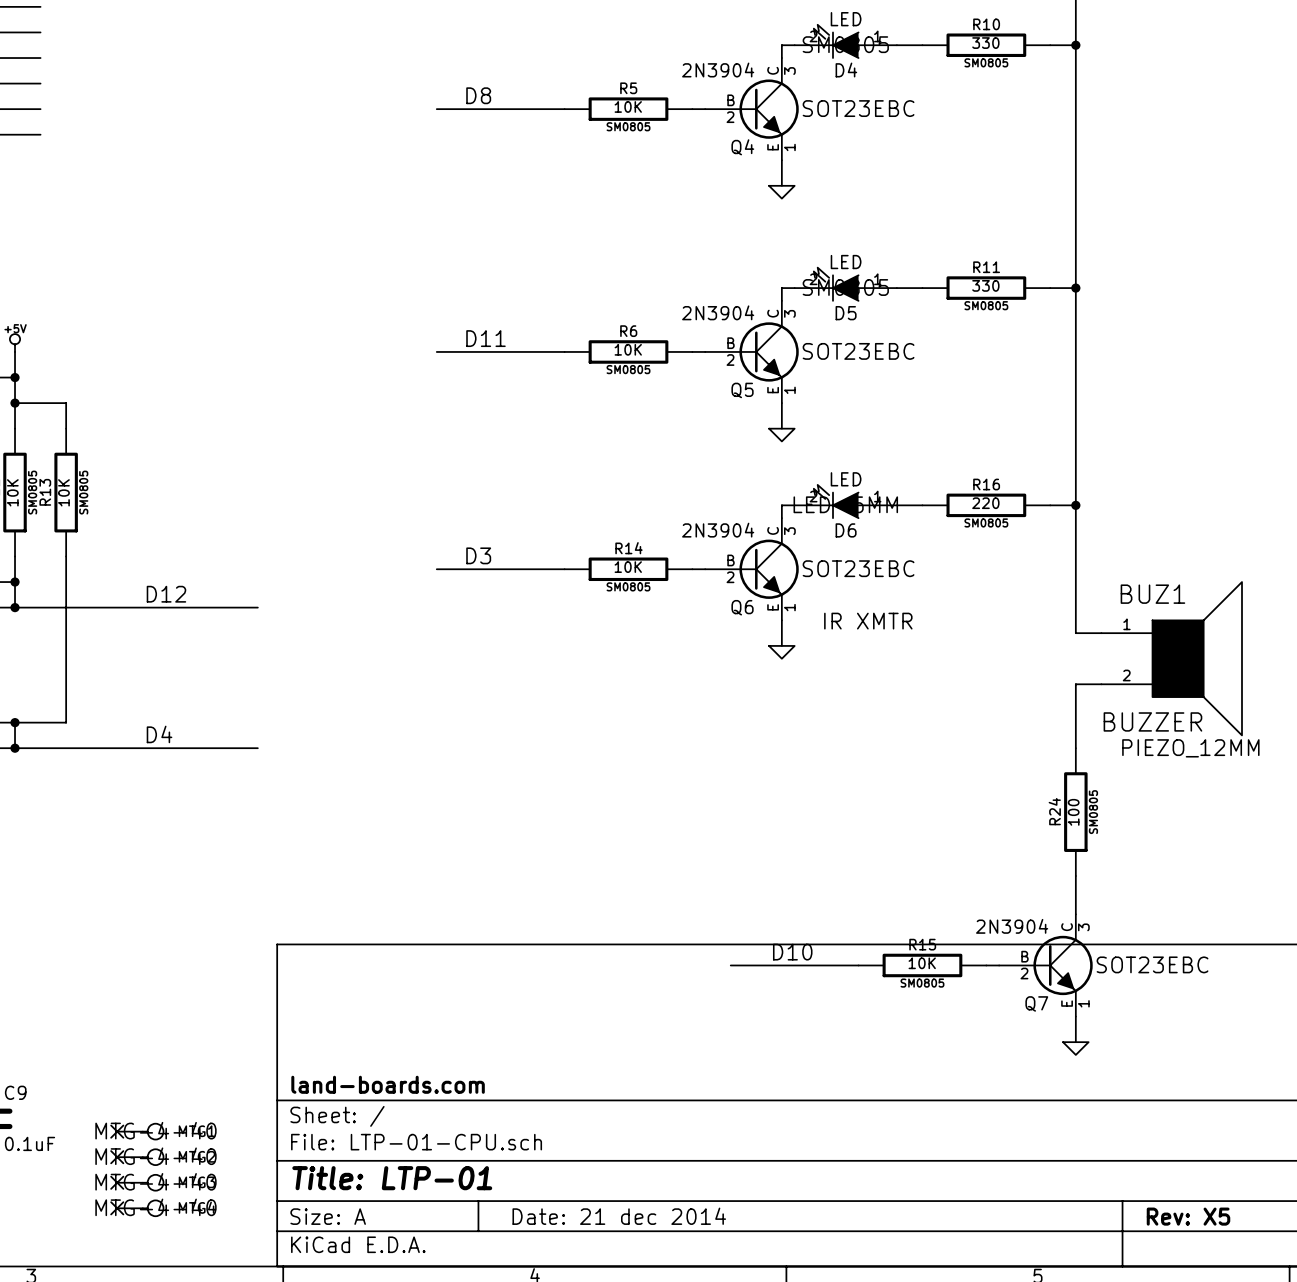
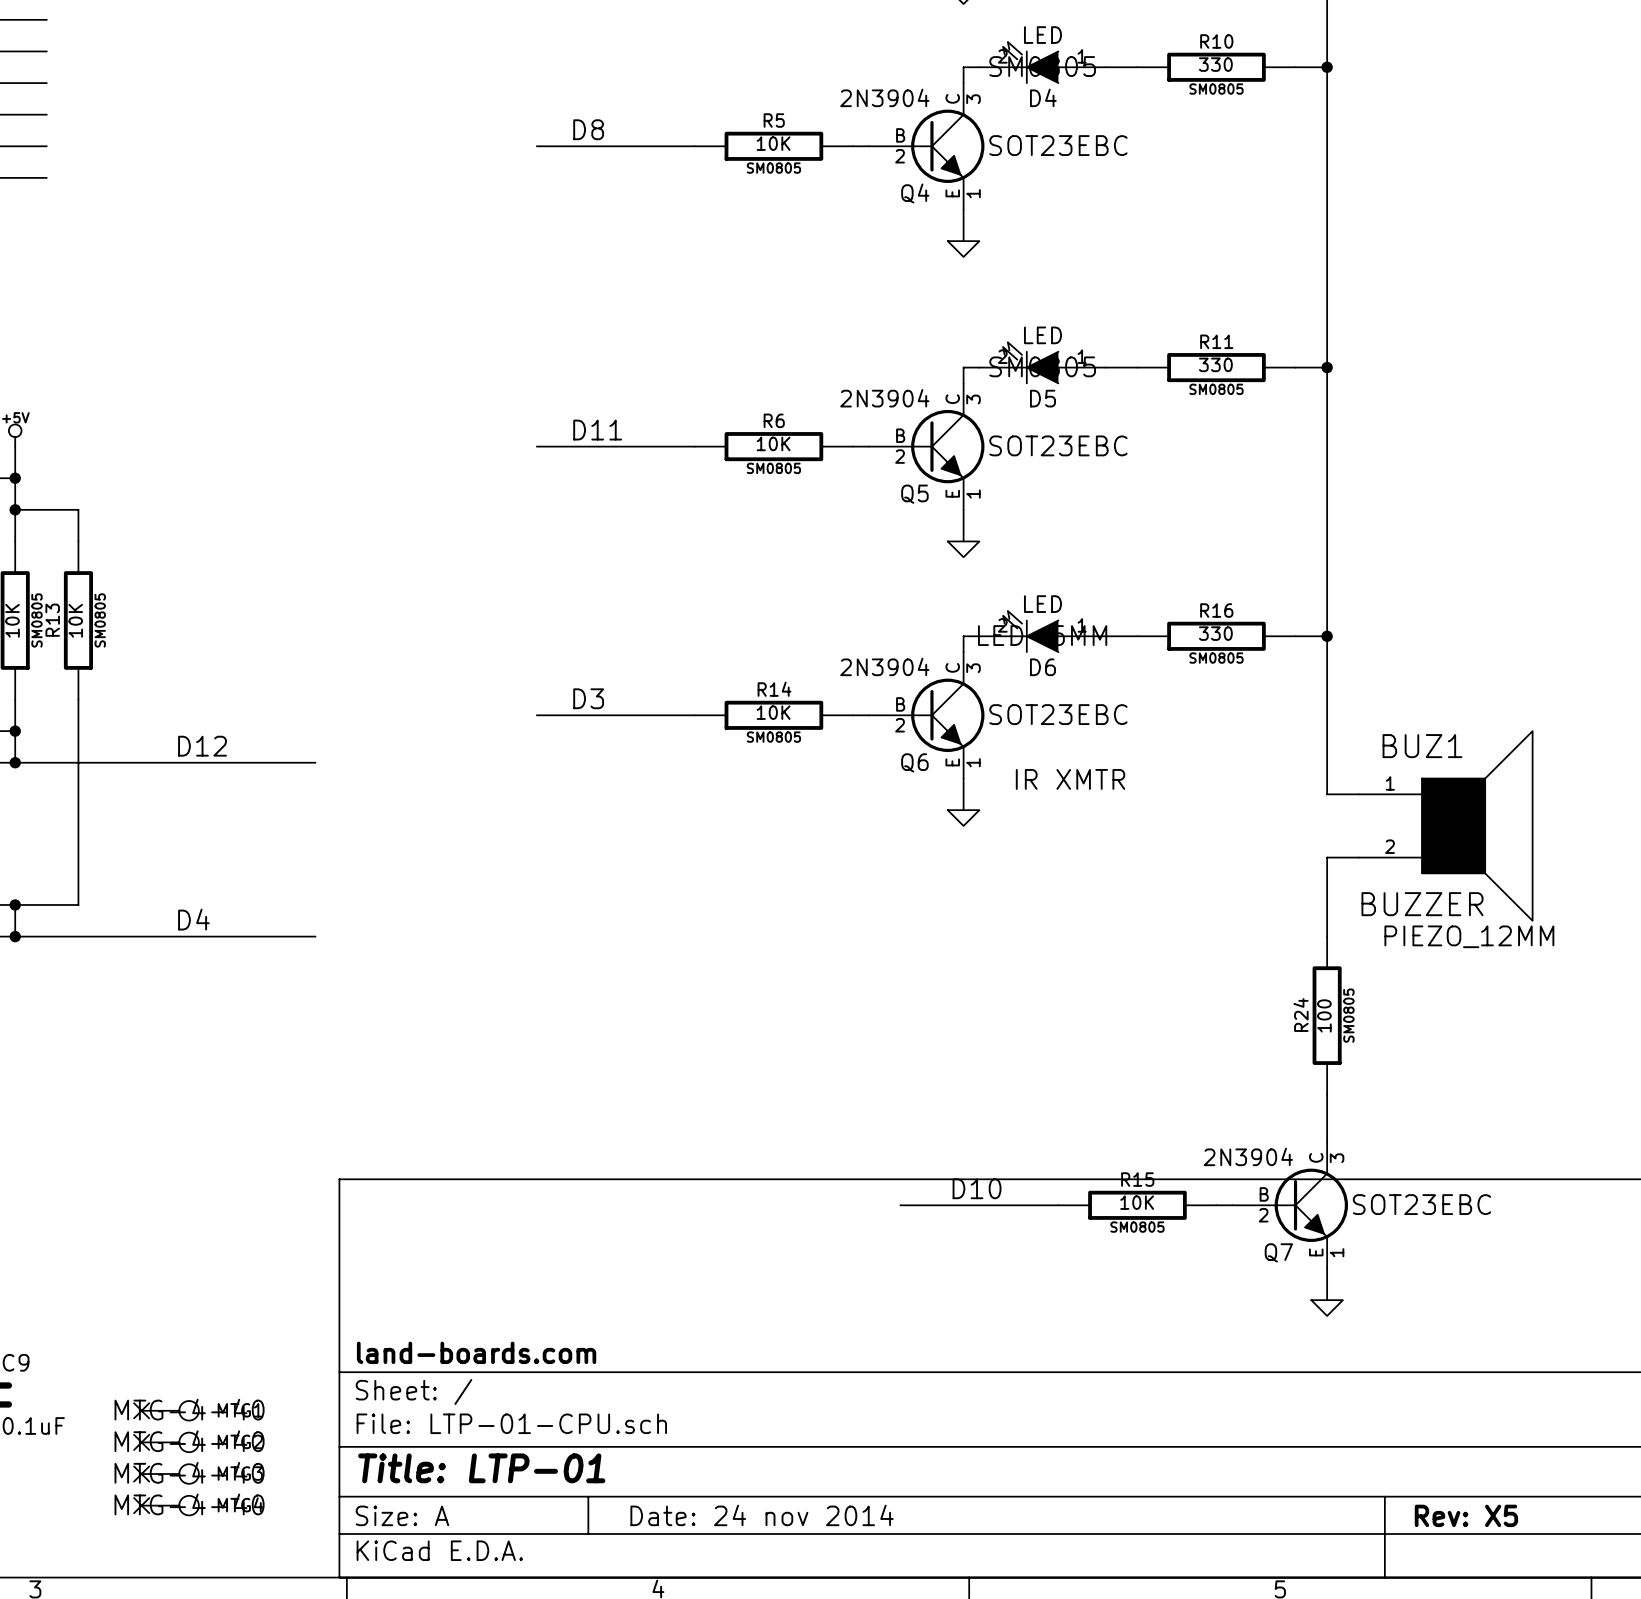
R16 value: 220 (985, 503) -> 330 (1215, 633)
title block: Date: 21 dec 2014 (619, 1216) -> Date: 24 nov 2014 (762, 1515)

